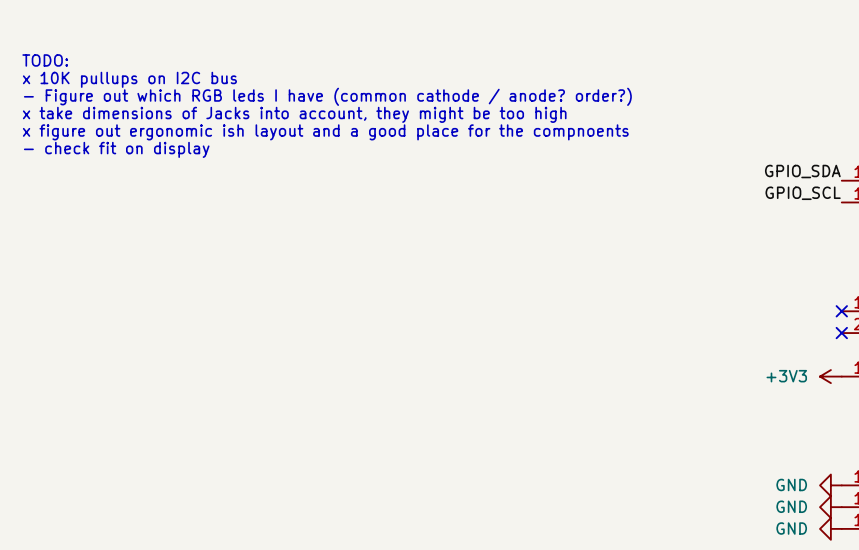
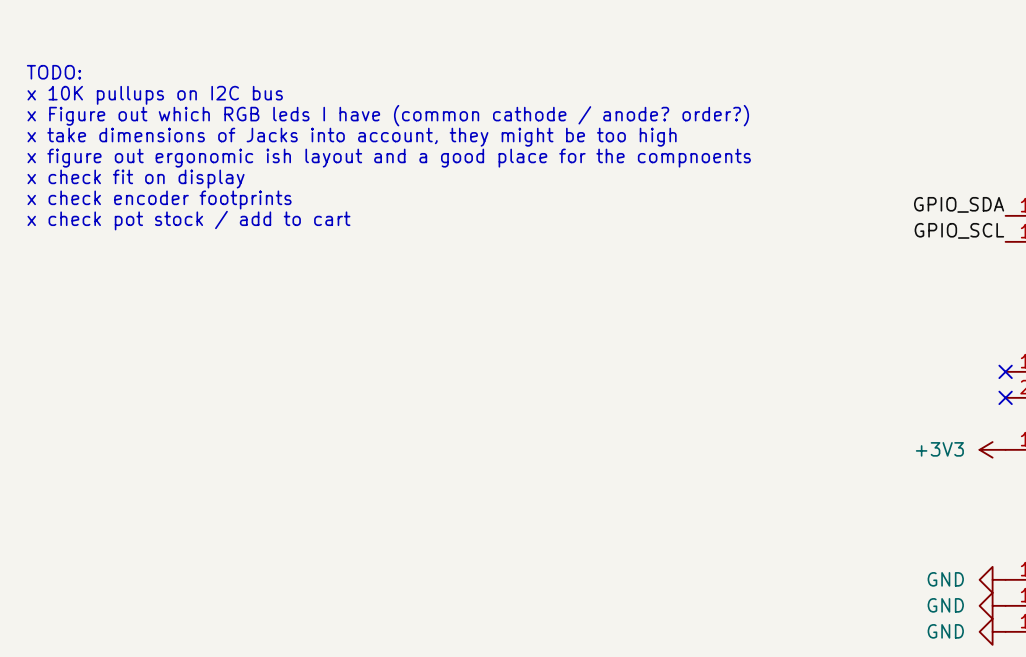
text: - Figure out which RGB leds I have (common cathode / anode? order?) (327, 96) -> x Figure out which RGB leds I have (common cathode / anode? order?) (388, 115)
text: - check fit on display (116, 149) -> x check fit on display (136, 179)
text: none -> x check encoder footprints (159, 199)
text: none -> x check pot stock / add to cart (188, 220)

